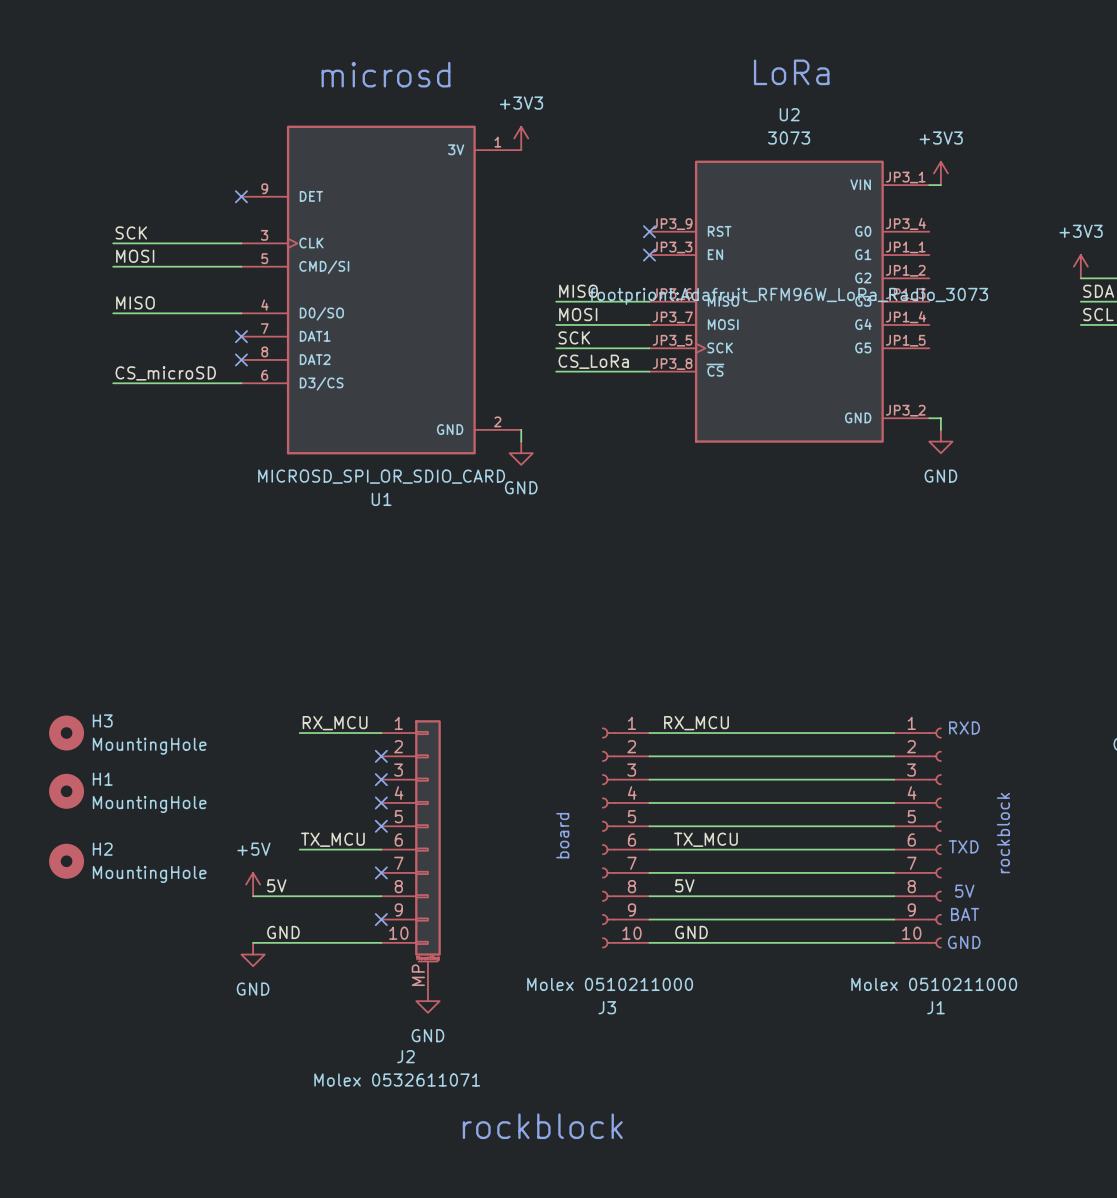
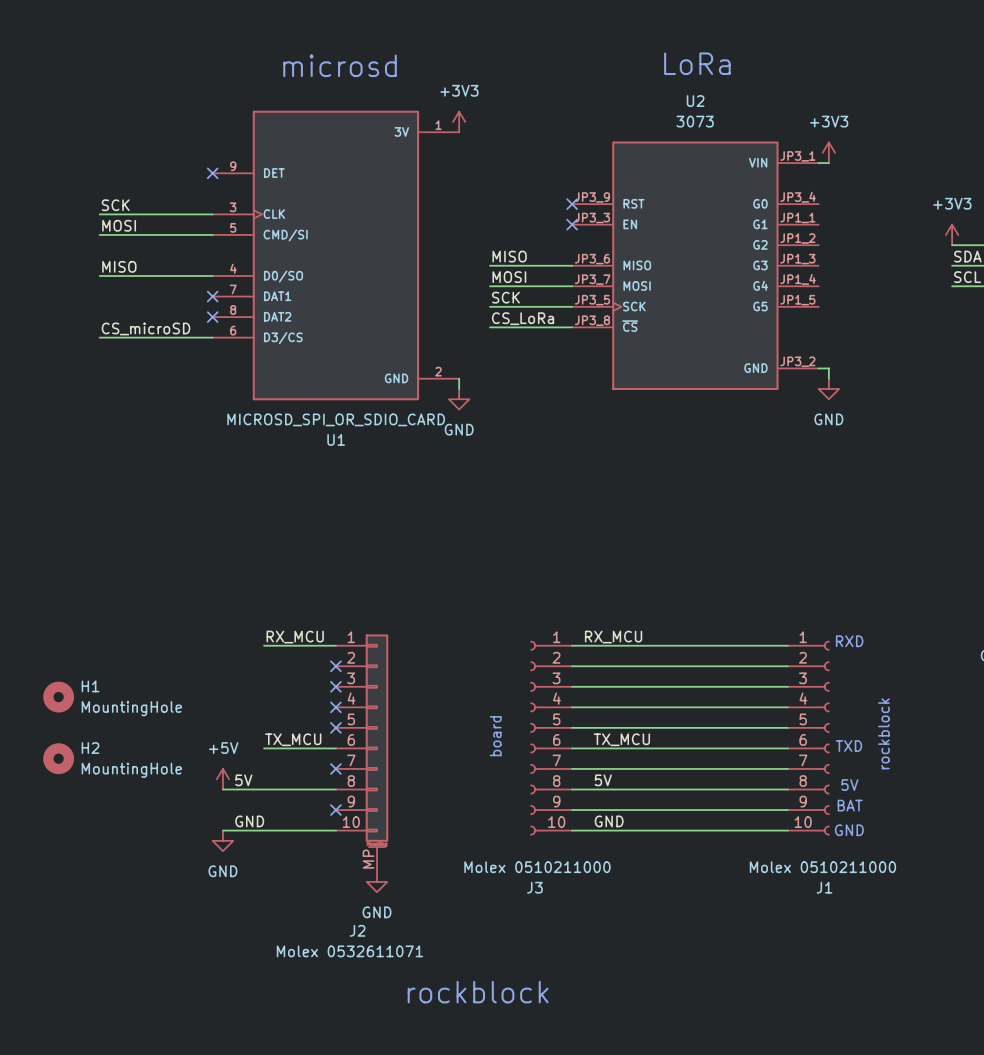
U2 text: footpriont:Adafruit_RFM96W_LoRa_Radio_3073 (788, 296) -> none
H3: MountingHole (66, 733) -> none

